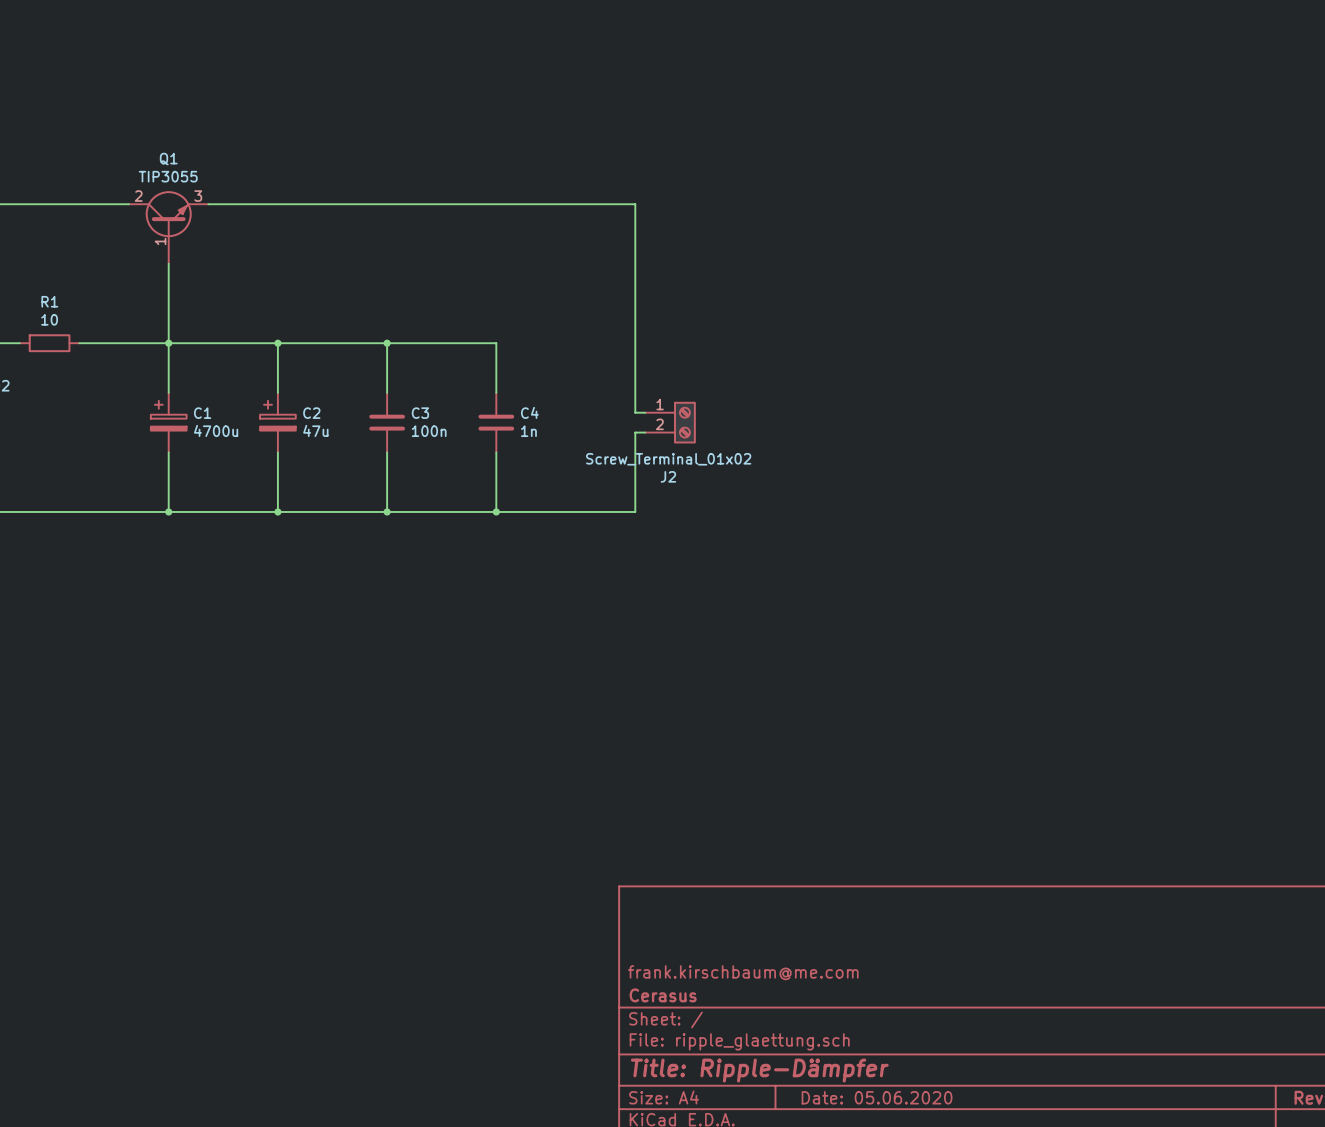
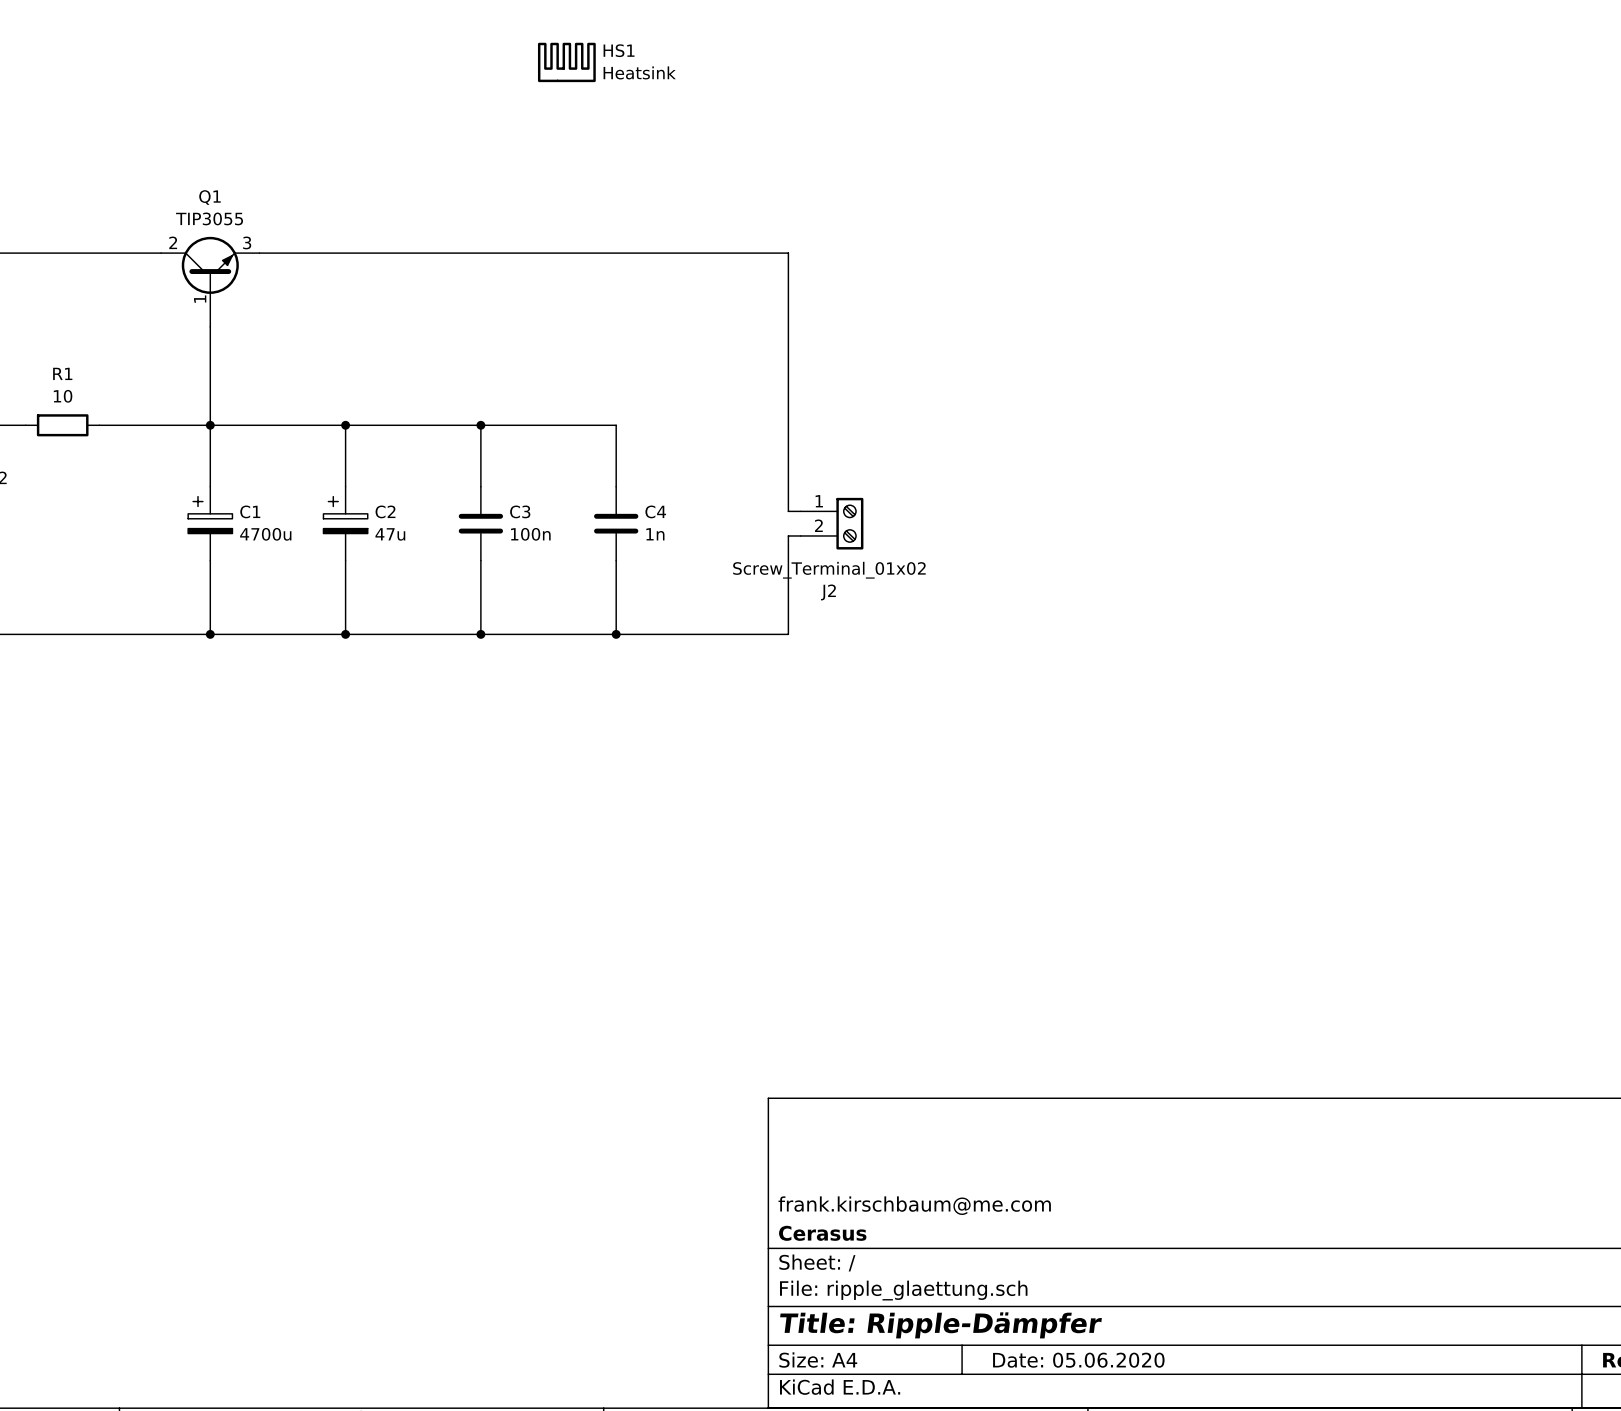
HS1: none -> Heatsink (566, 62)

